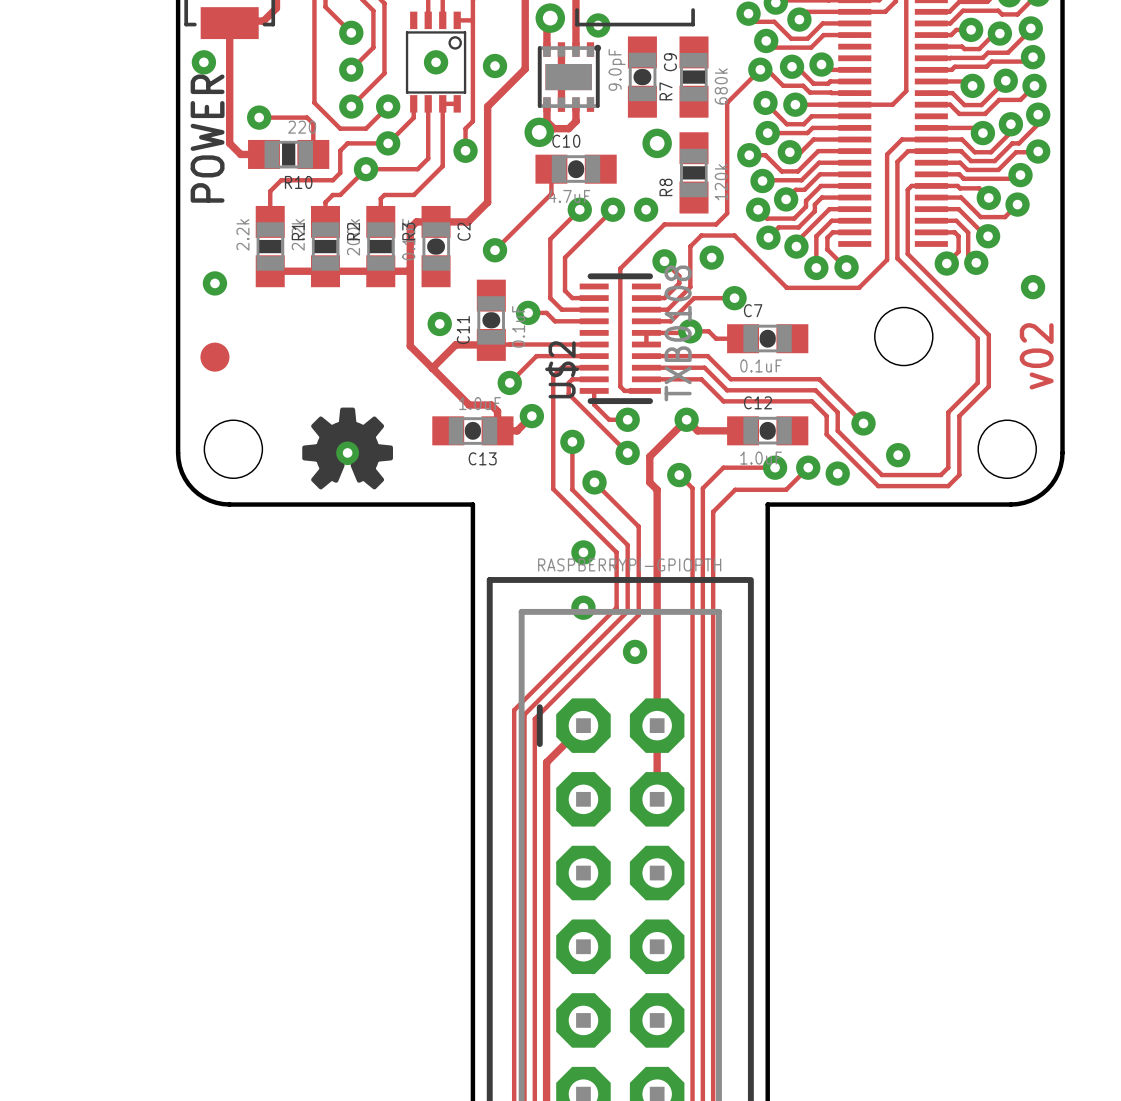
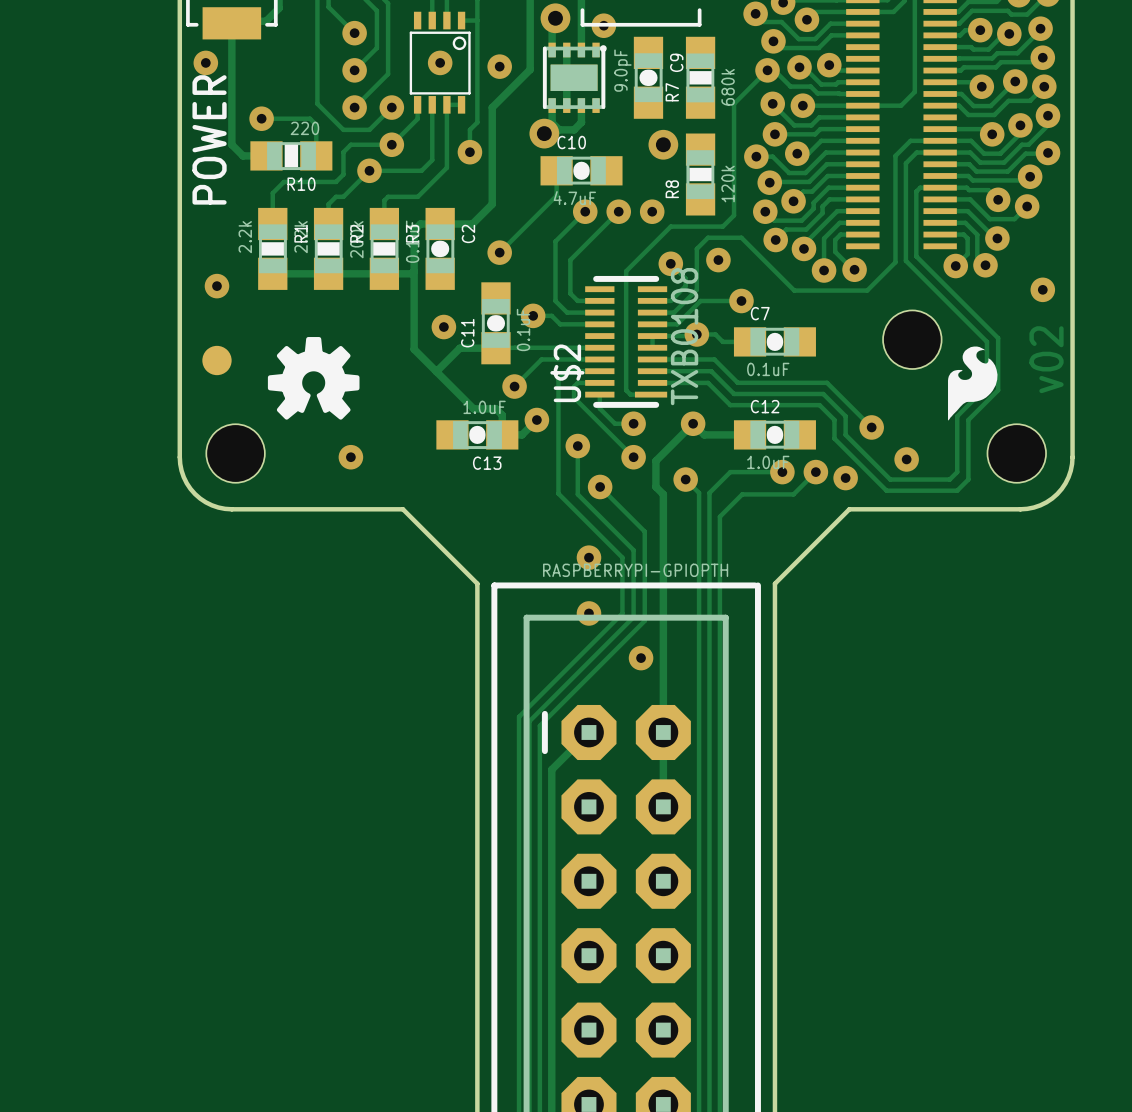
drawing: none -> [948, 346, 998, 421]
drawing position: (347, 448) -> (313, 378)
board edge: (399, 504) (472, 504) (472, 578) -> (402, 509) (477, 583)
board edge: (841, 504) (767, 504) (767, 578) -> (849, 509) (774, 583)

